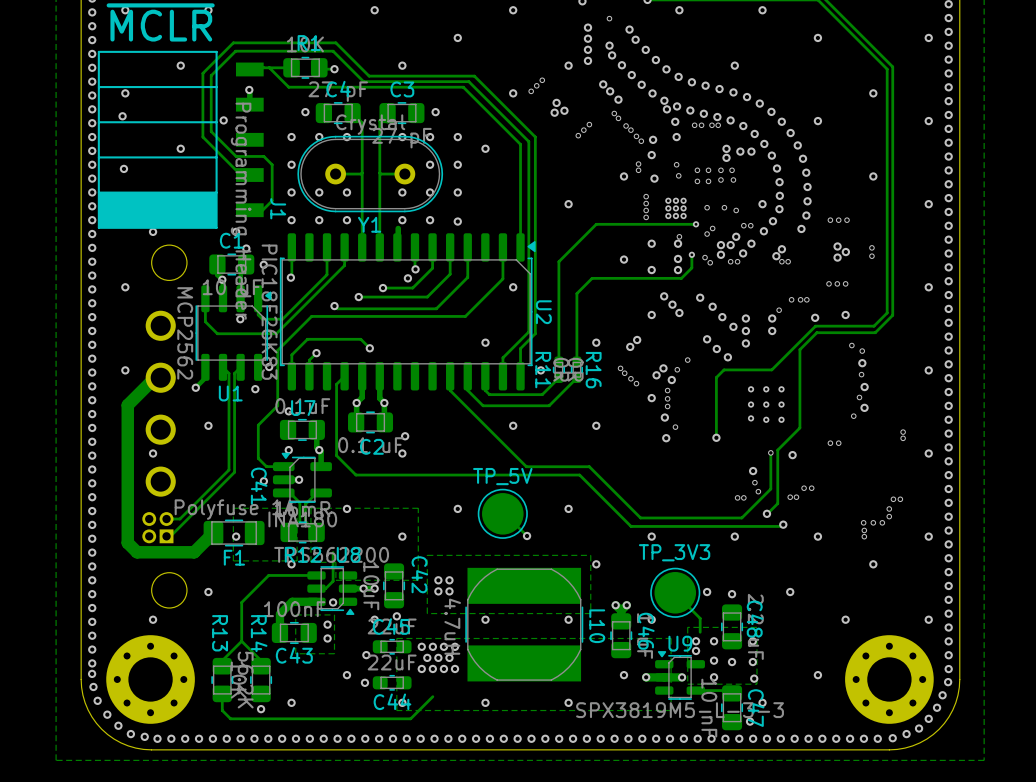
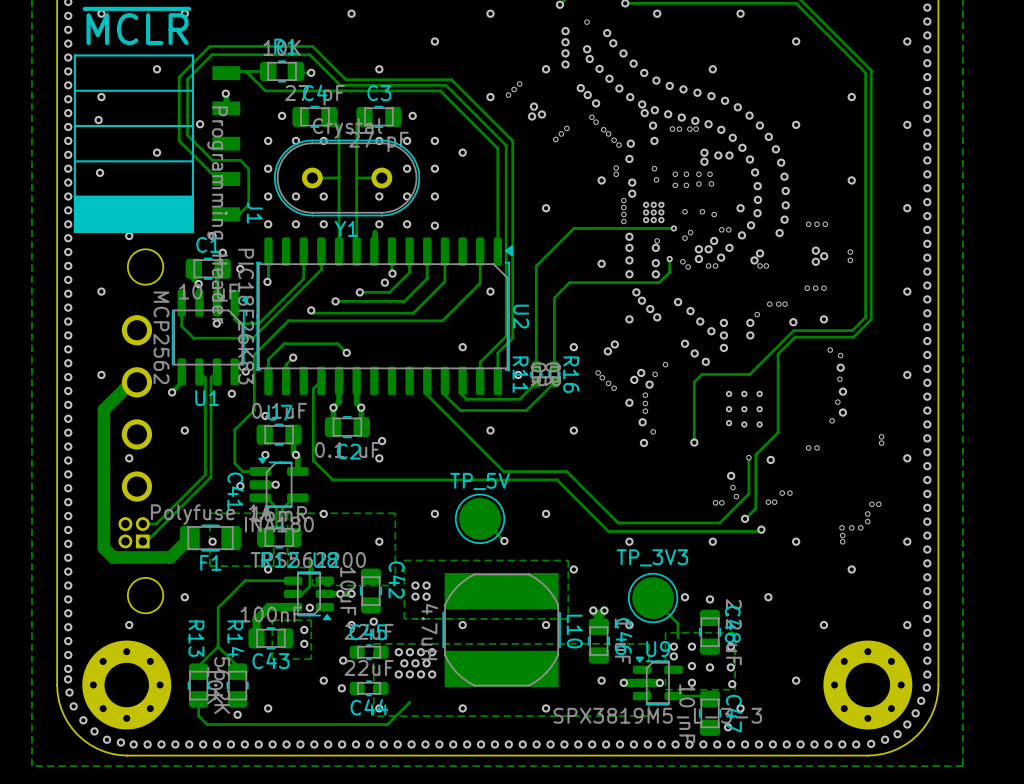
via: none -> (632, 193)
via: none -> (629, 236)
via: none -> (629, 260)
via: none -> (636, 292)

